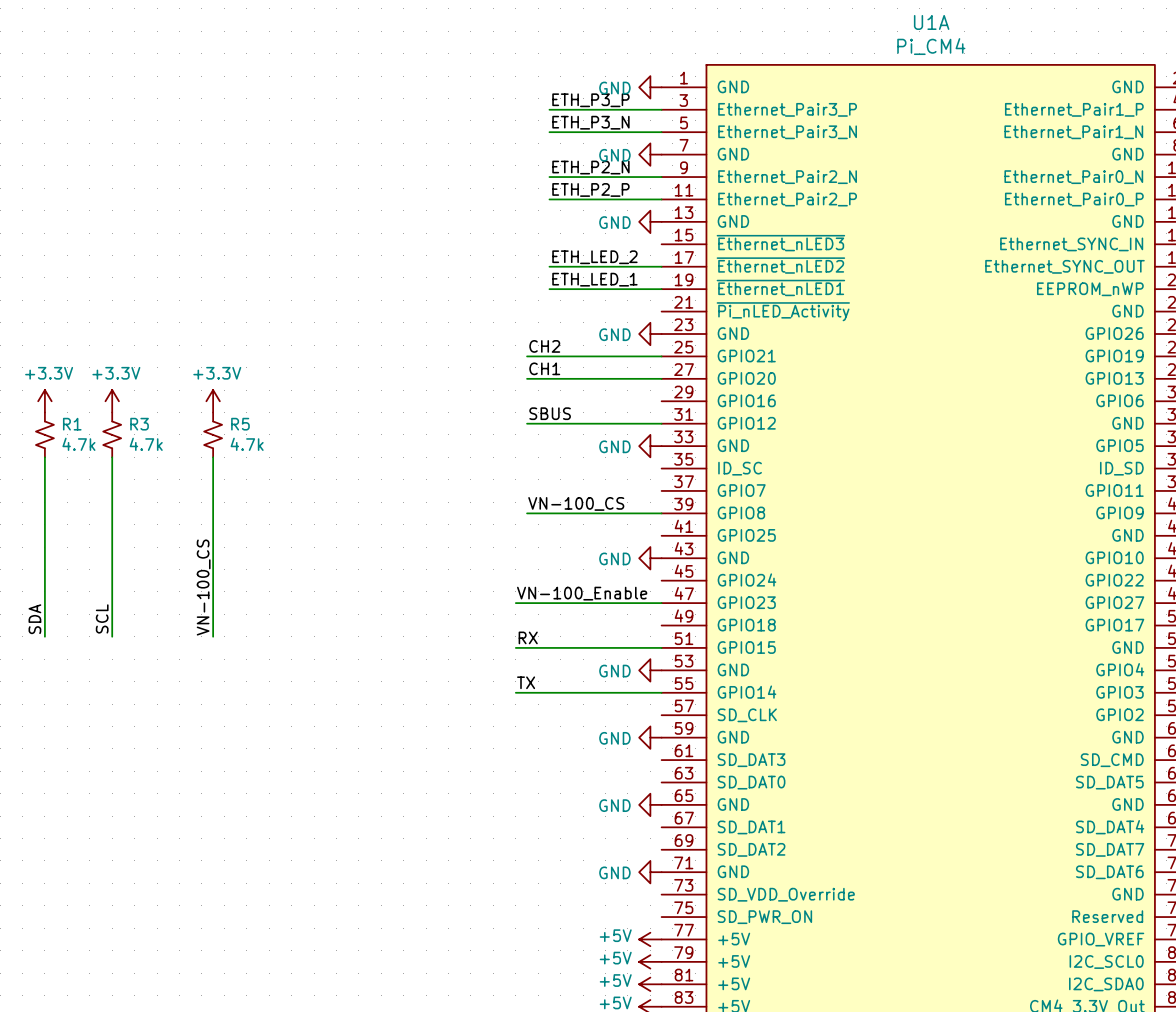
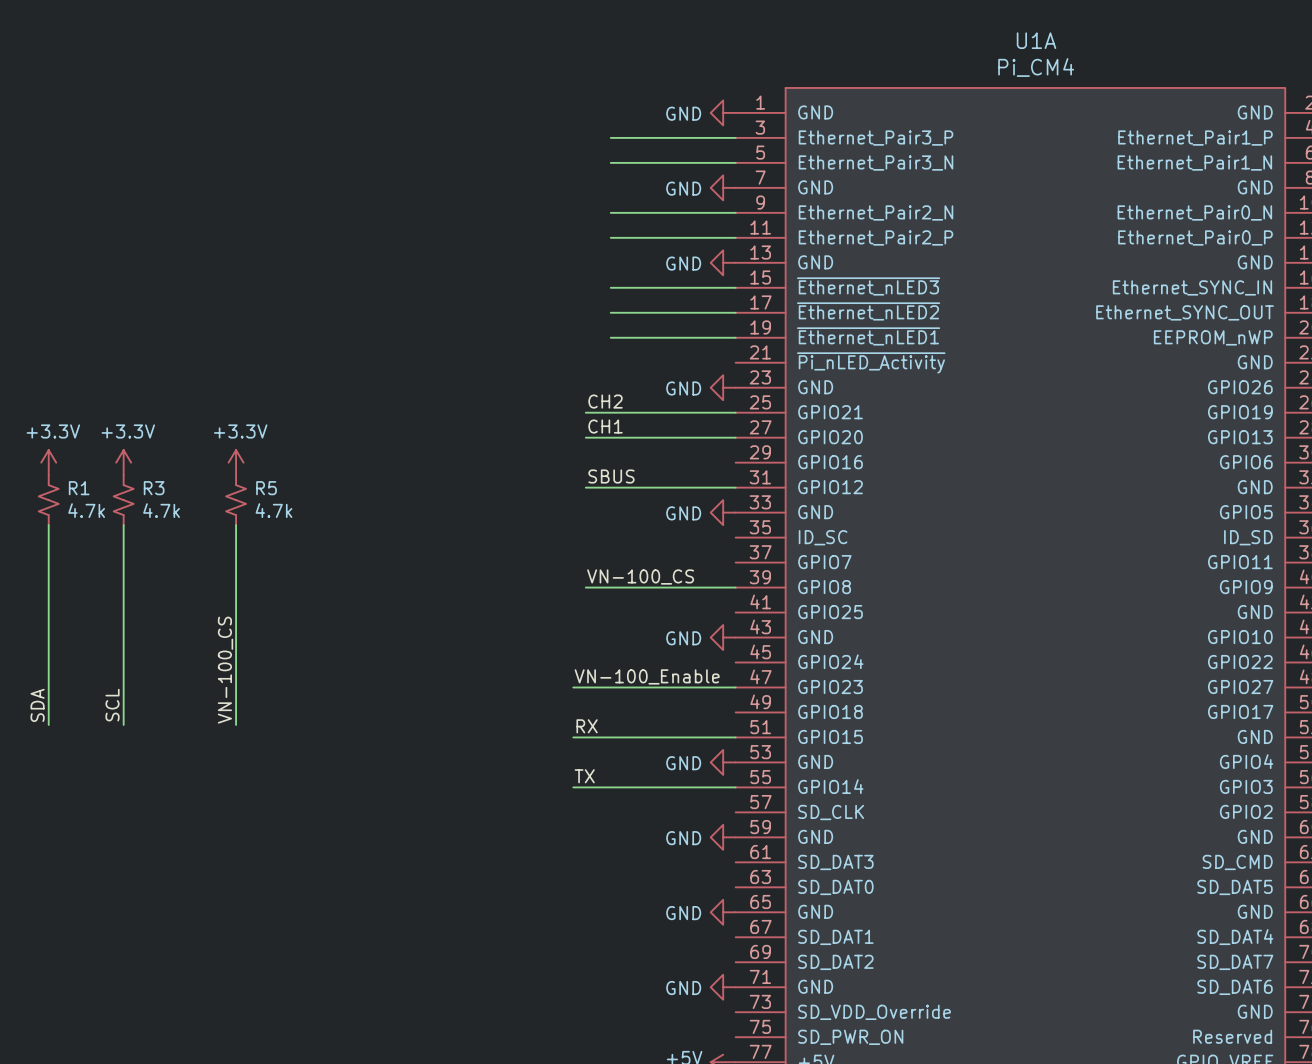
label: ETH_P3_P (590, 100) -> none
label: ETH_P3_N (590, 122) -> none
label: ETH_P2_N (590, 167) -> none
label: ETH_P2_P (590, 189) -> none
wire: none -> (610, 287) (735, 287)
label: ETH_LED_2 (594, 257) -> none
label: ETH_LED_1 (594, 279) -> none

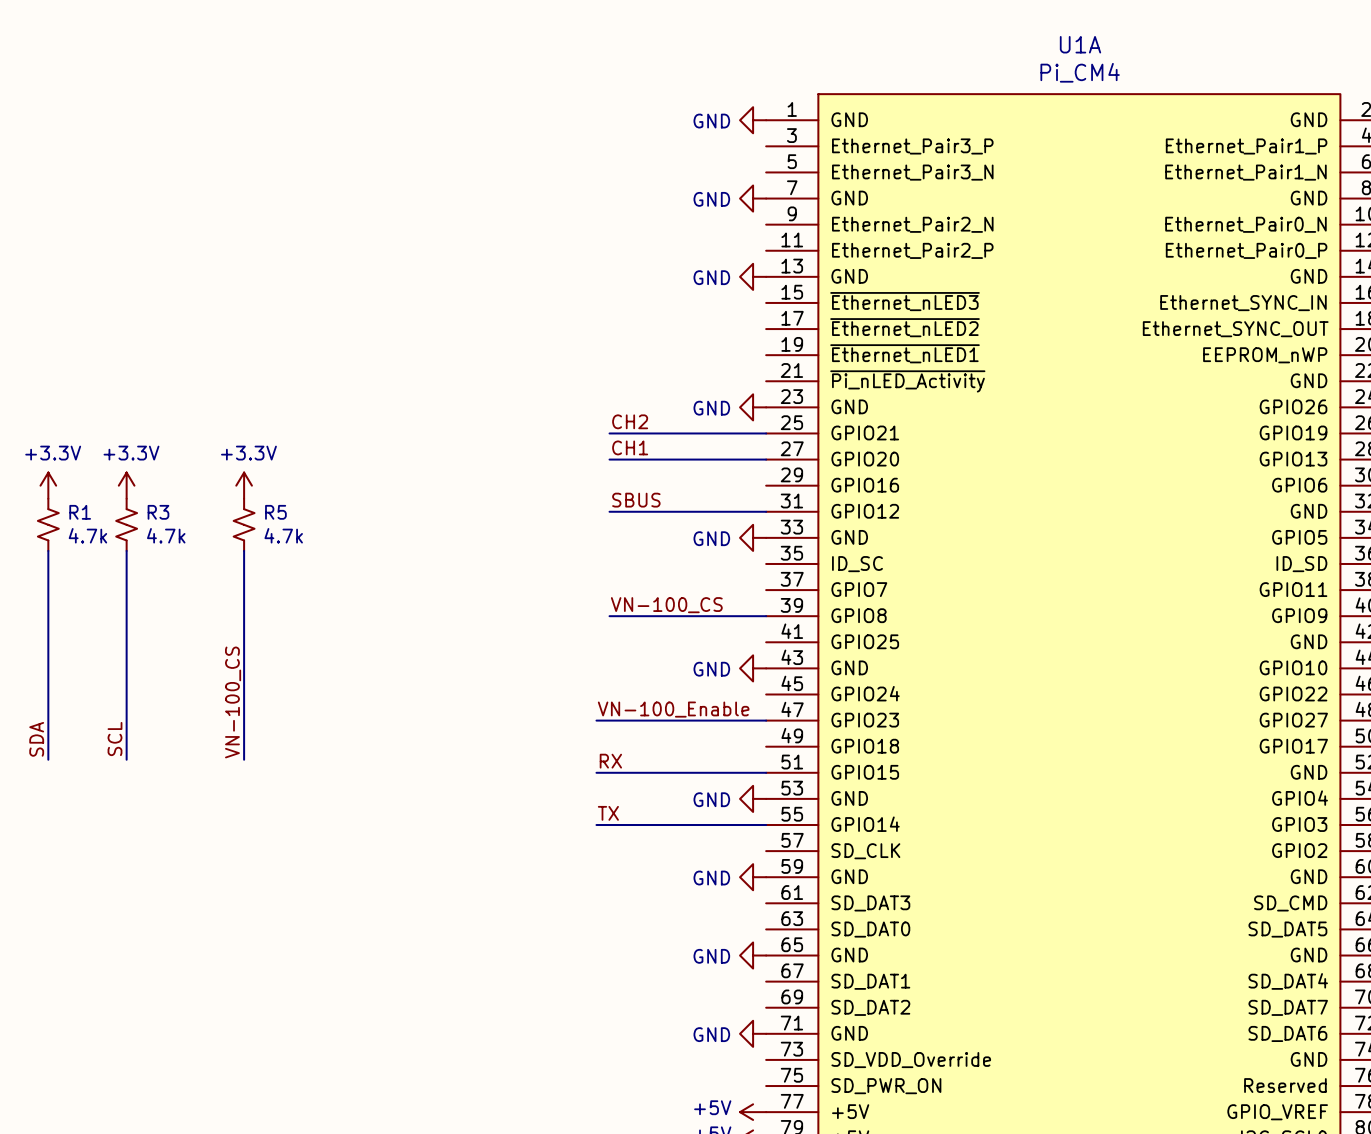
wire: (610, 137) (735, 137) -> none
wire: (610, 162) (735, 162) -> none
wire: (610, 212) (735, 212) -> none
wire: (610, 237) (735, 237) -> none
wire: (610, 287) (735, 287) -> none
wire: (610, 312) (735, 312) -> none
wire: (610, 337) (735, 337) -> none

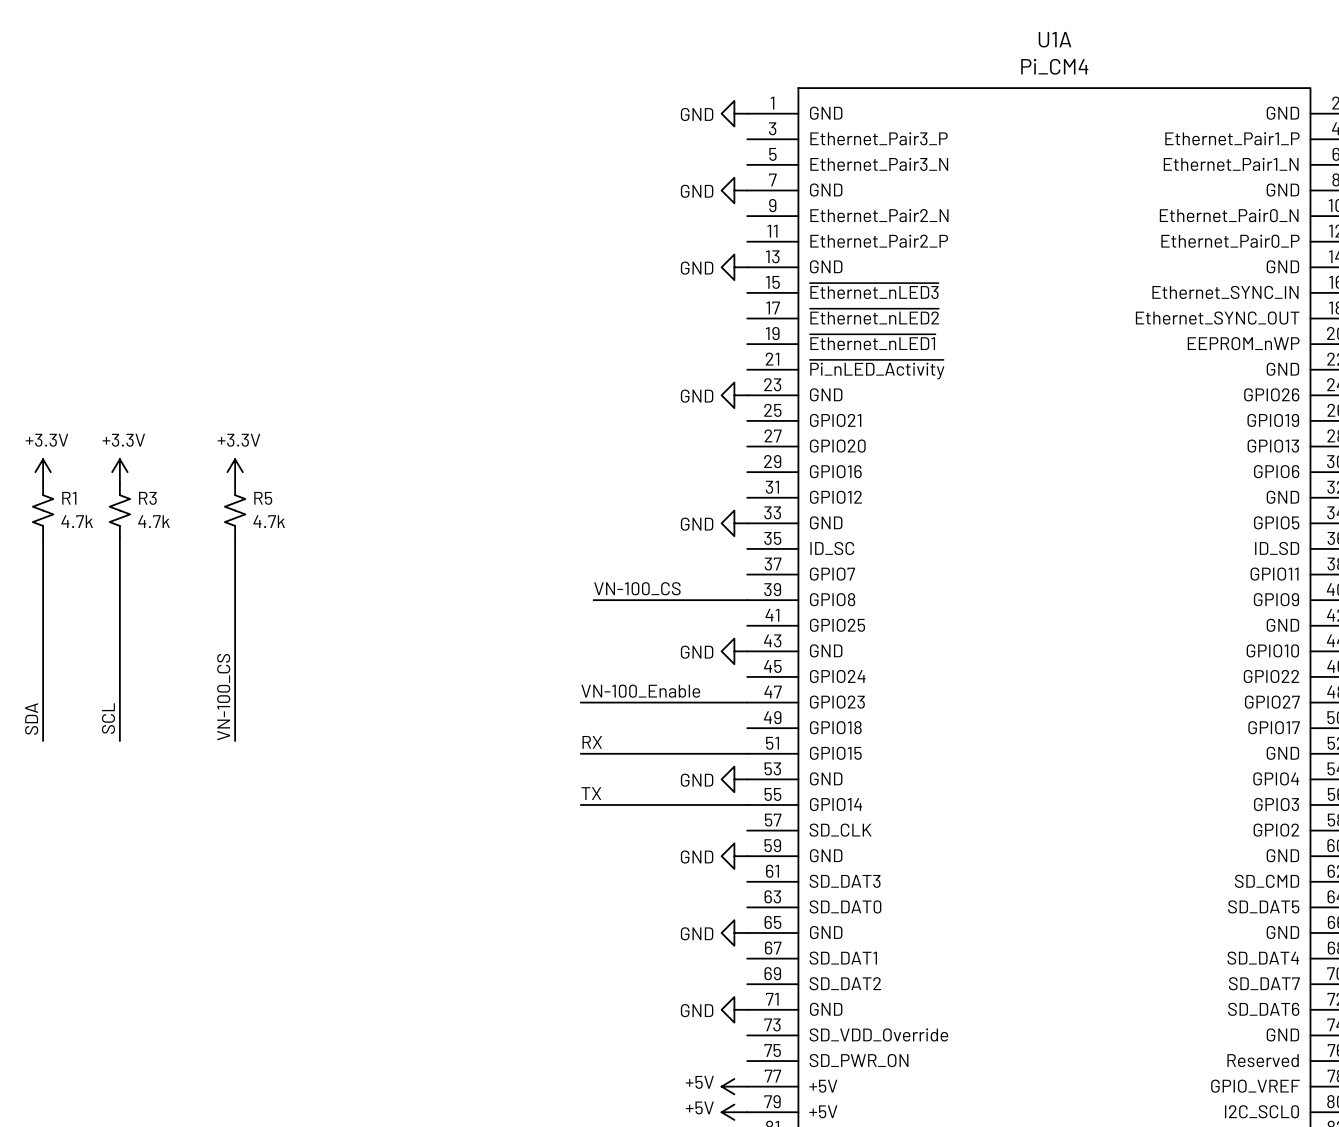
label: CH2 (630, 421) -> none
wire: (609, 433) (766, 433) -> none
label: CH1 (630, 447) -> none
wire: (609, 459) (766, 459) -> none
label: SBUS (636, 500) -> none
wire: (609, 511) (766, 511) -> none

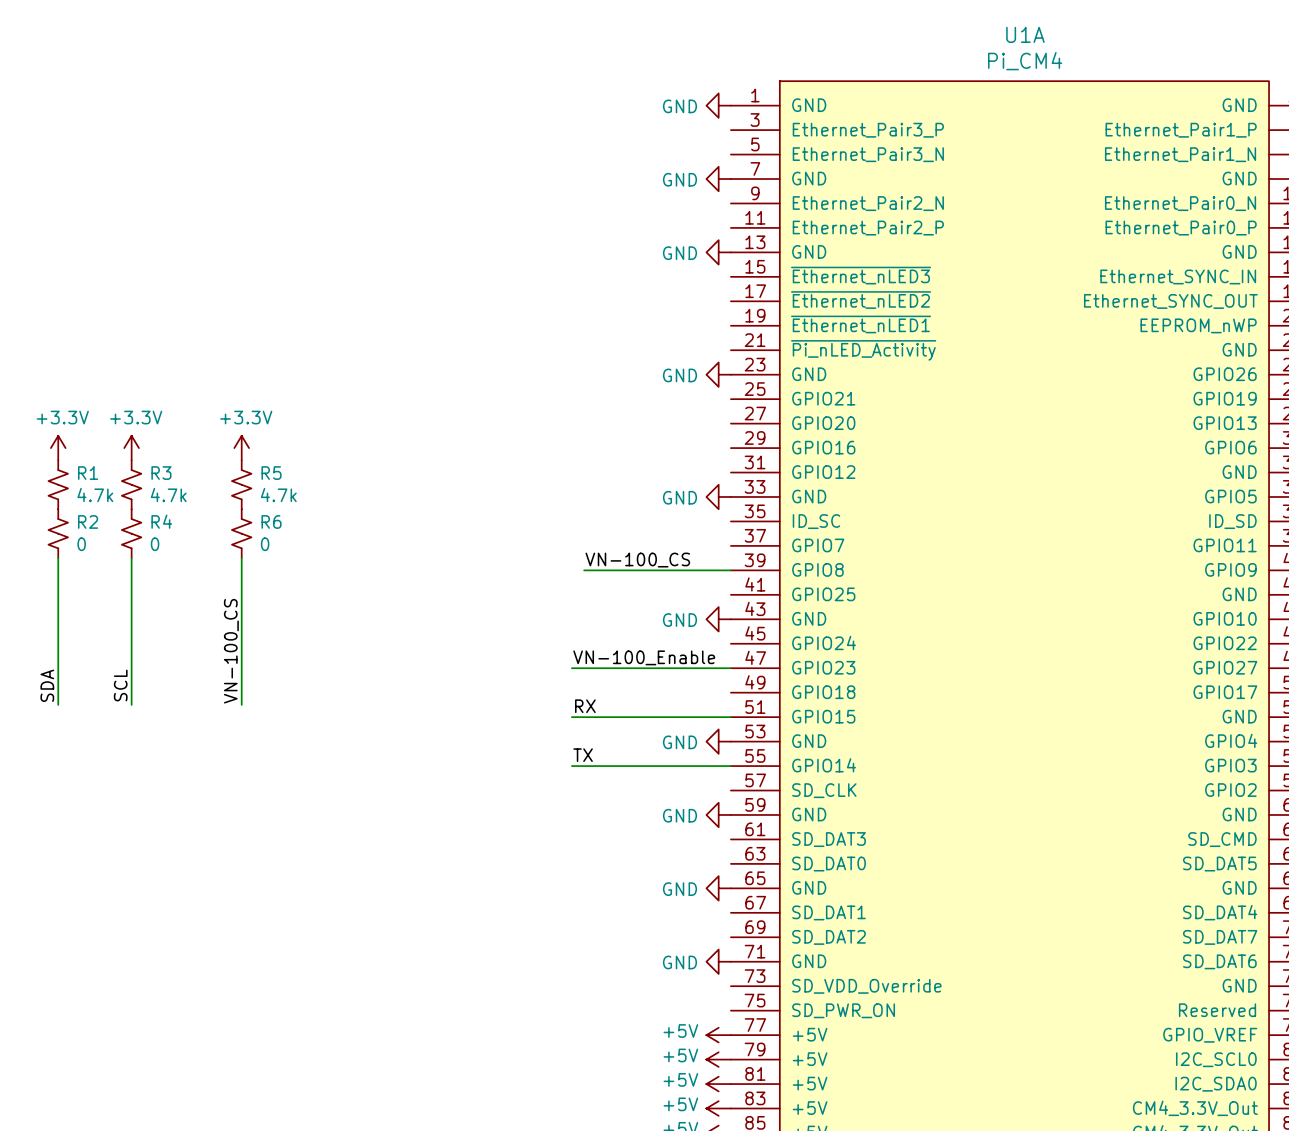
R2: none -> 0 (58, 533)
R4: none -> 0 (131, 533)
R6: none -> 0 (241, 533)

